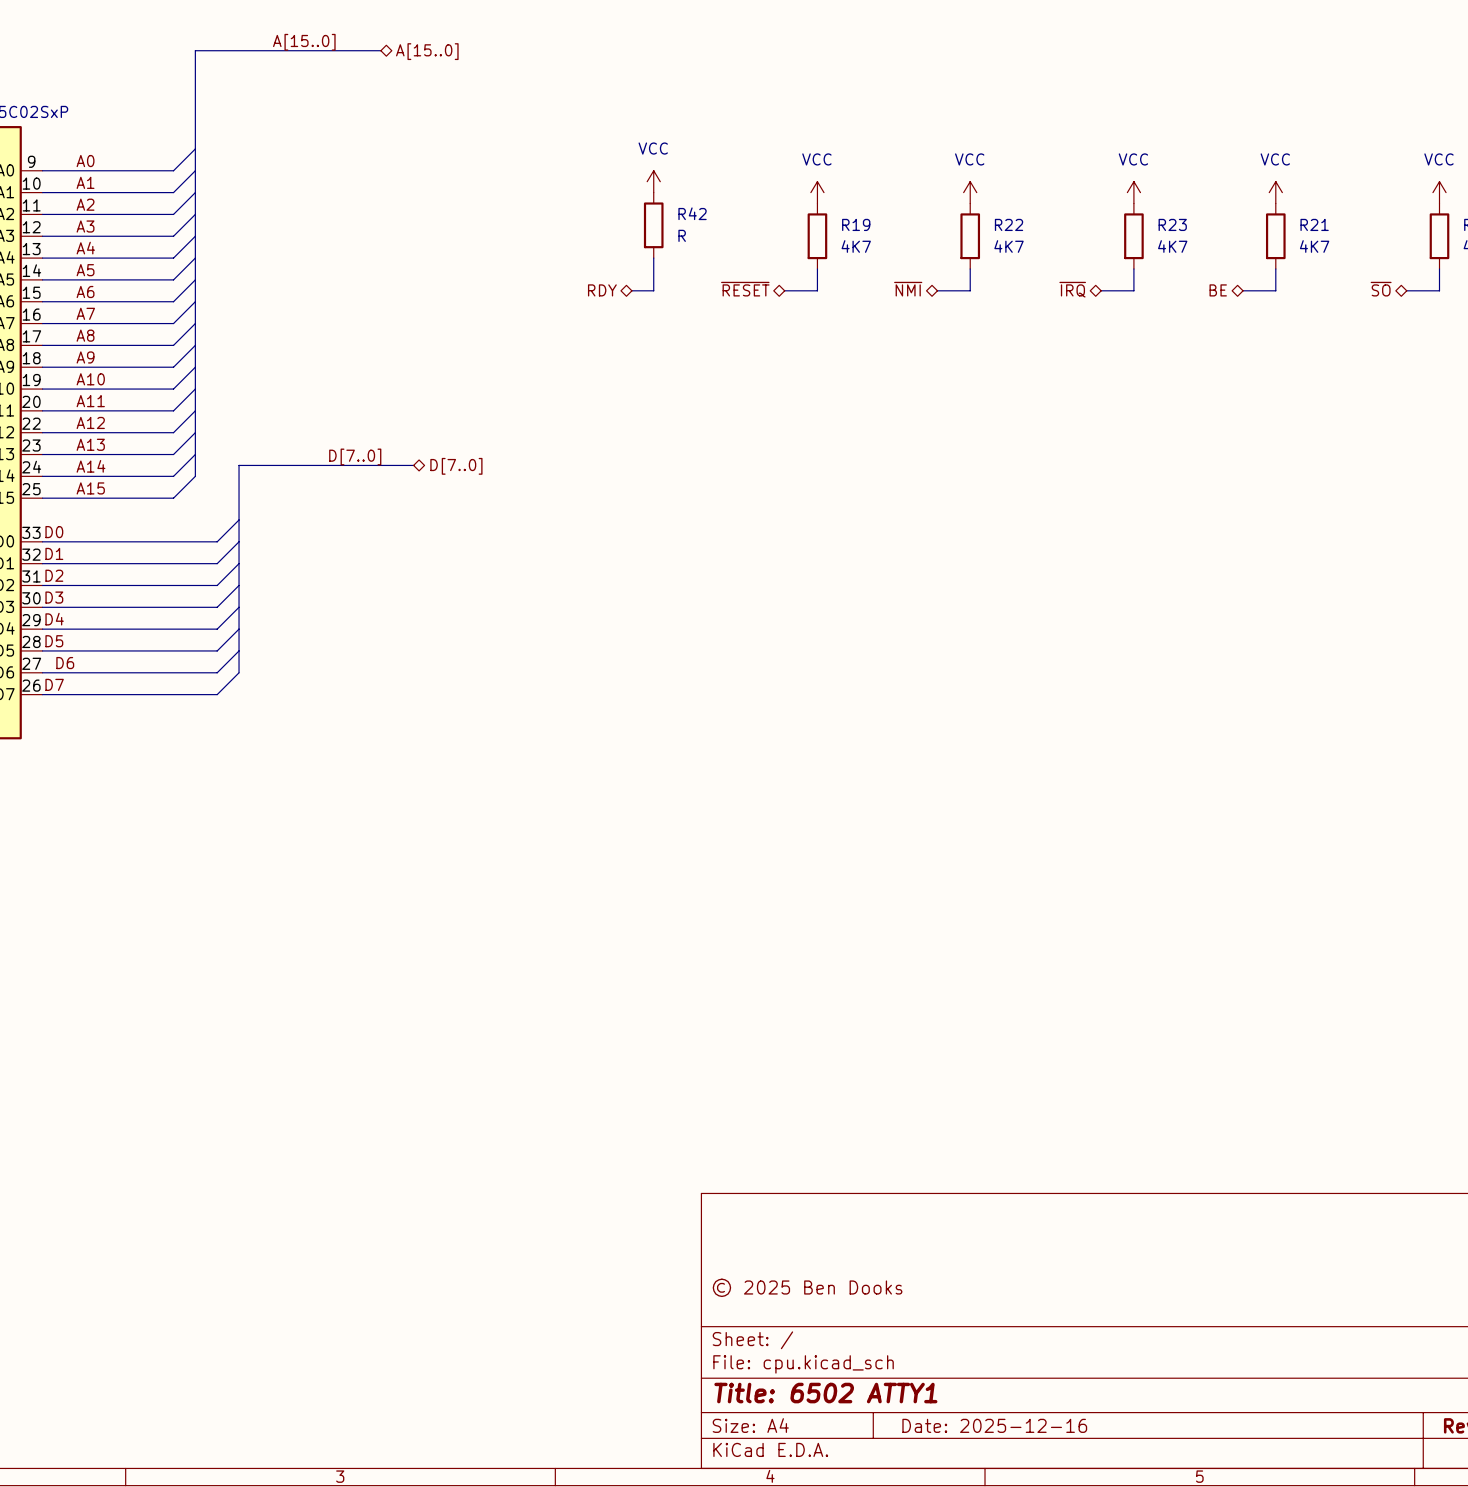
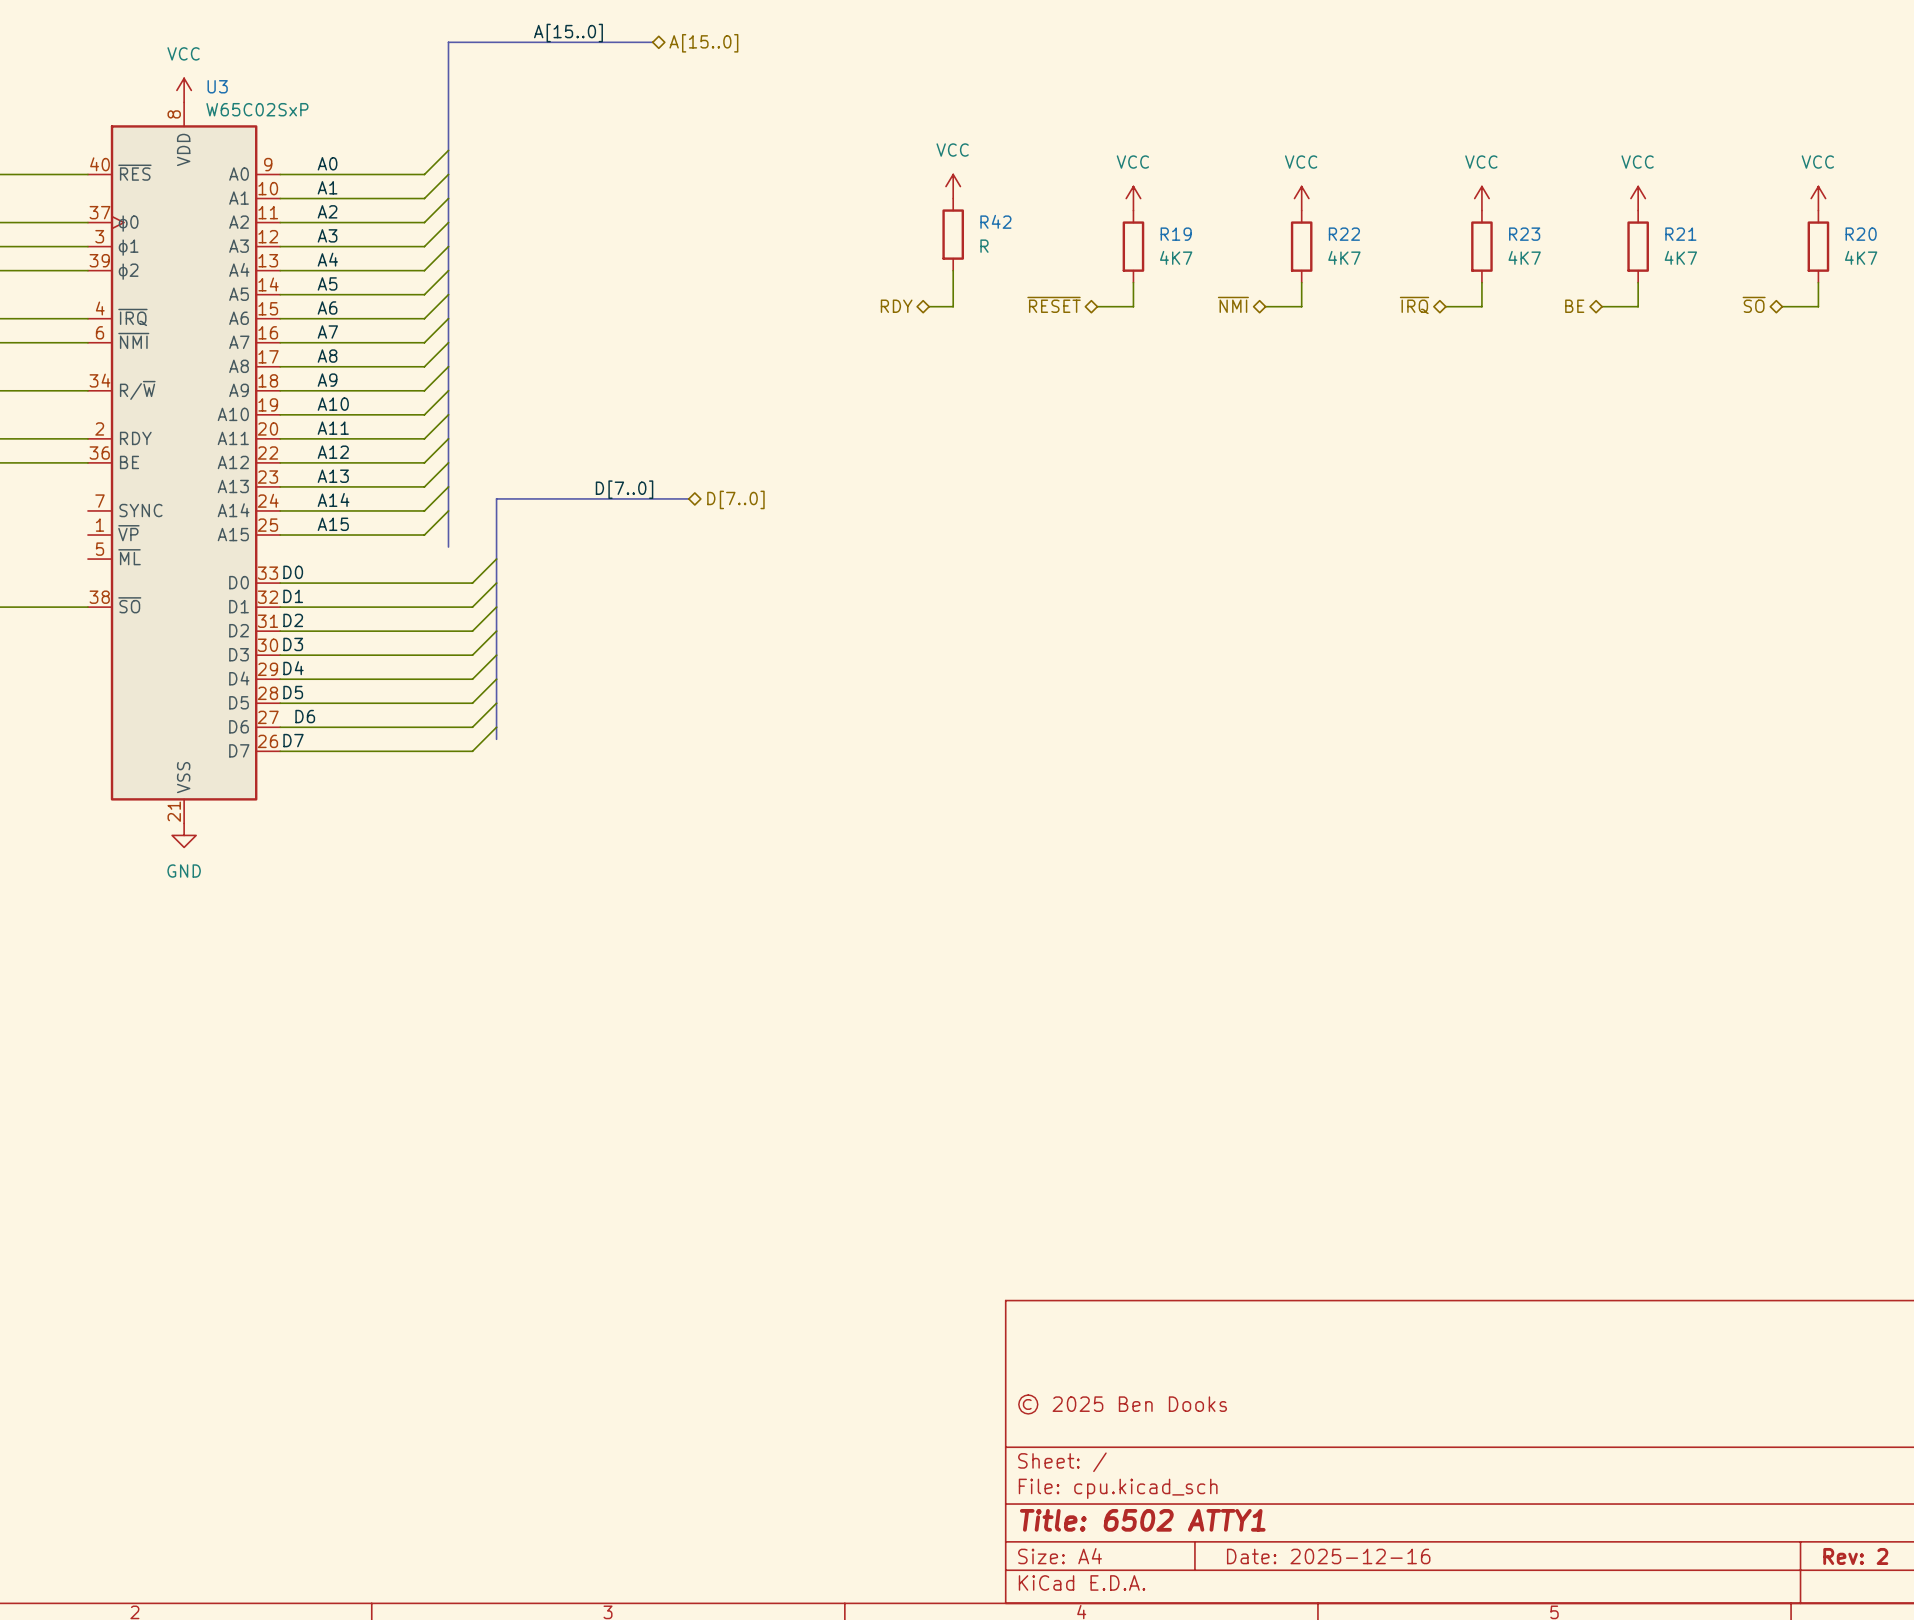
bus: none -> (448, 510) (448, 547)
bus: none -> (496, 727) (496, 739)

